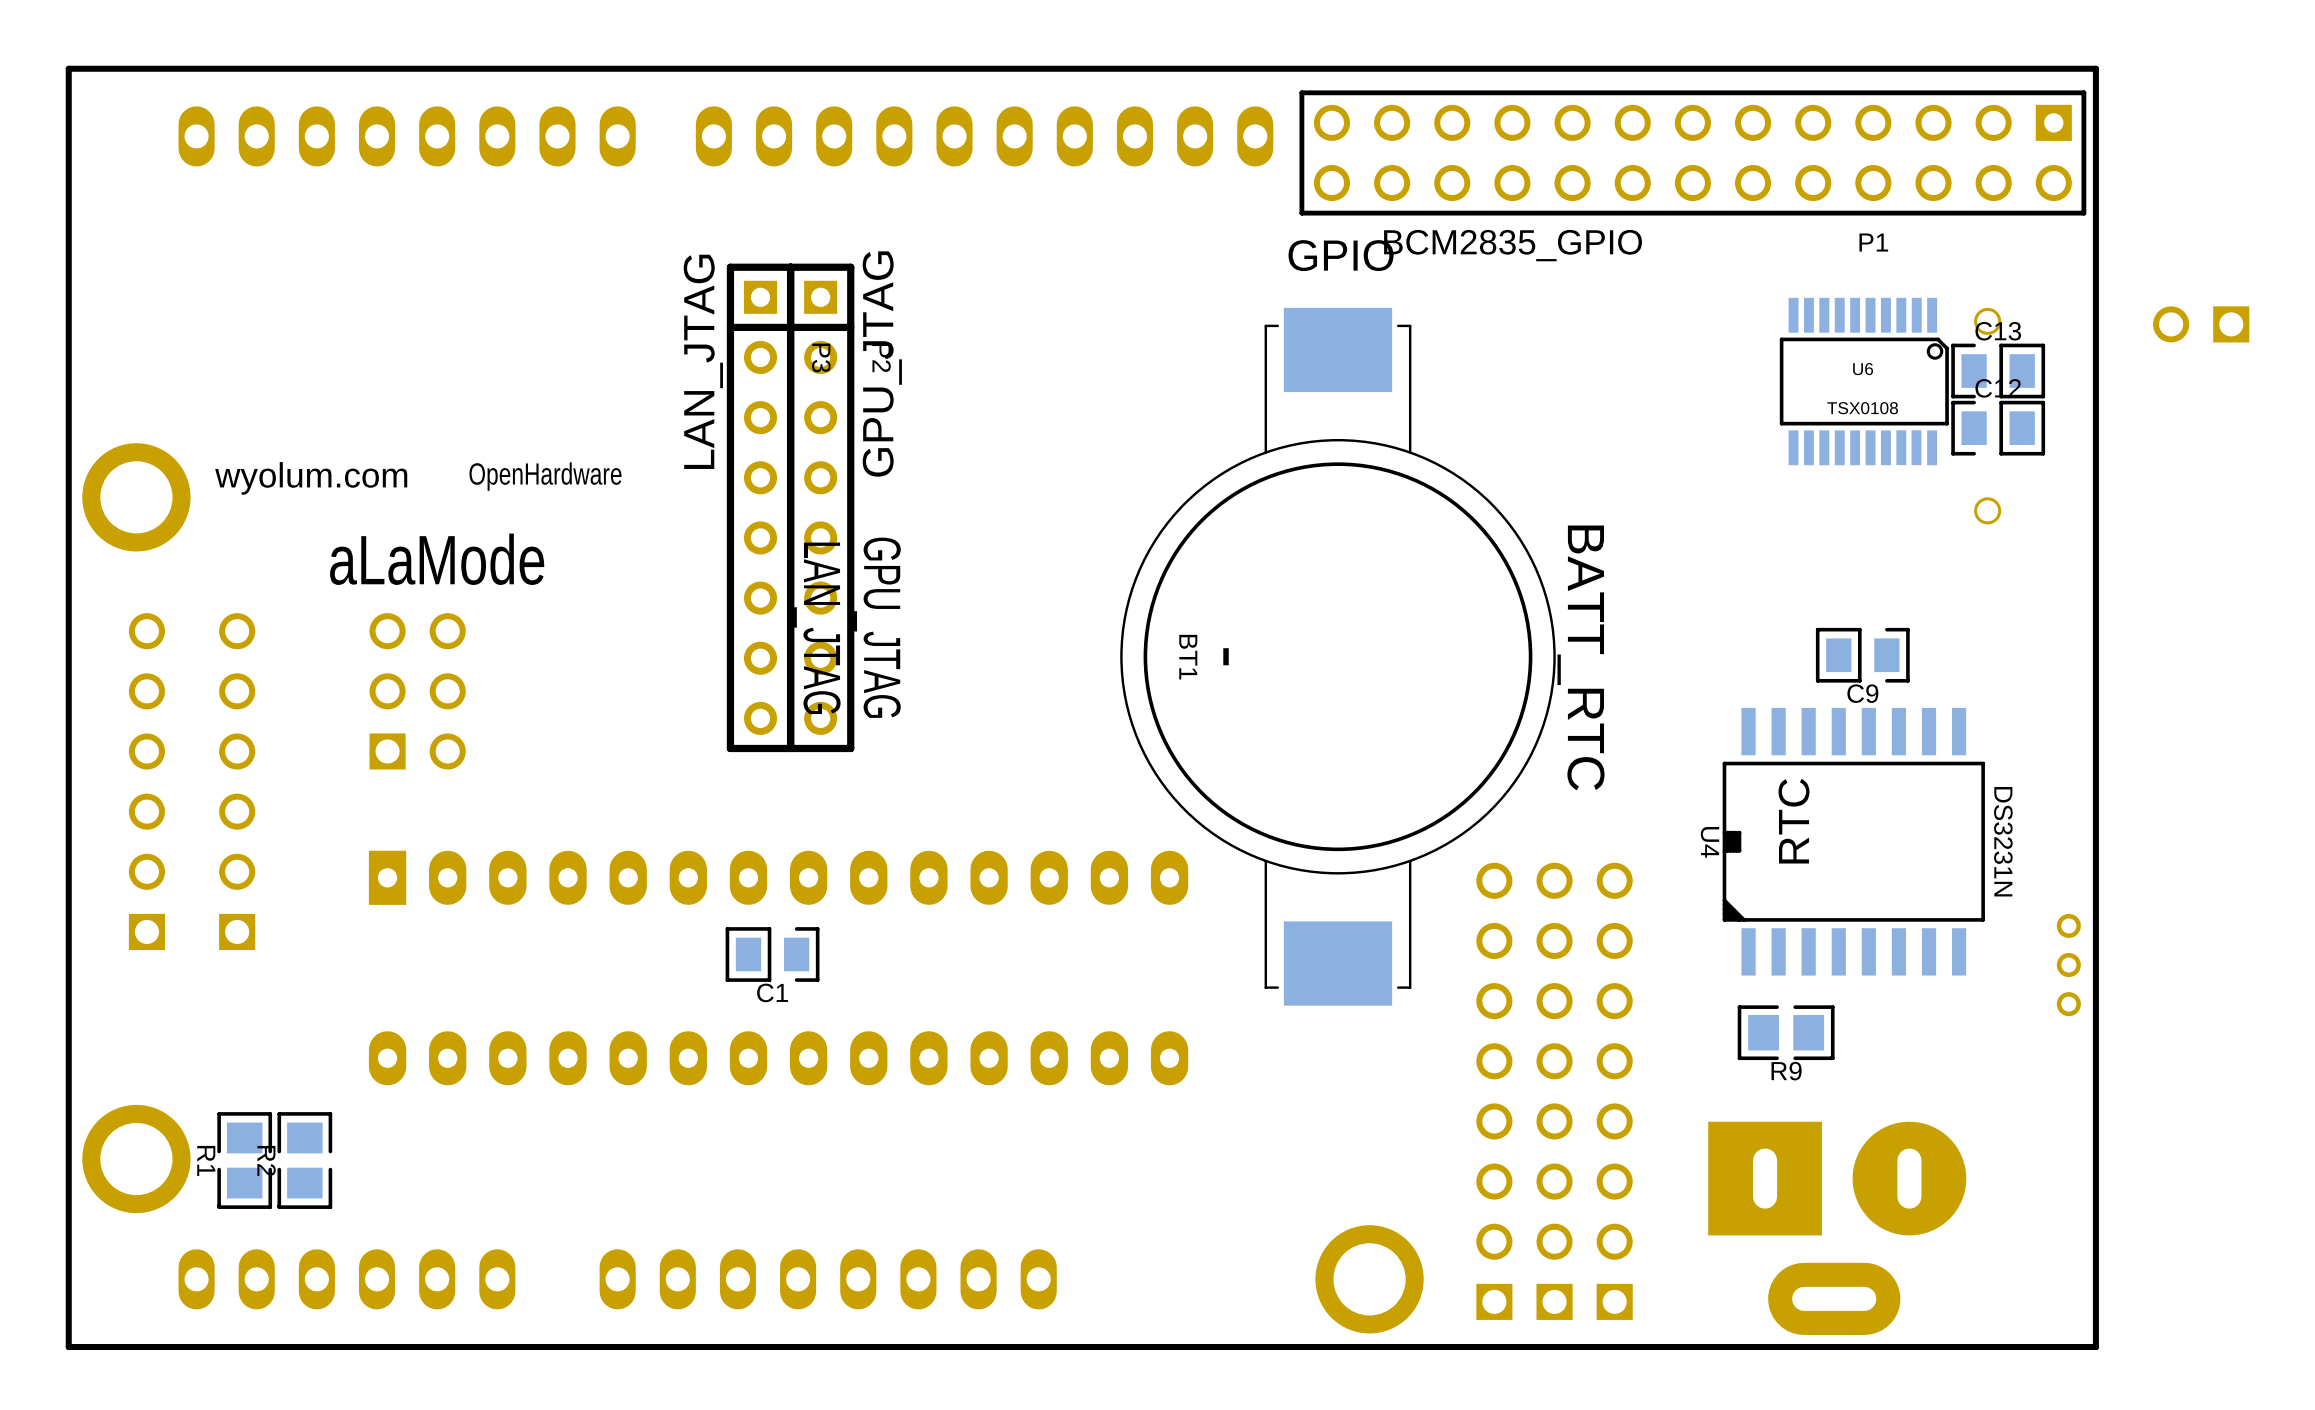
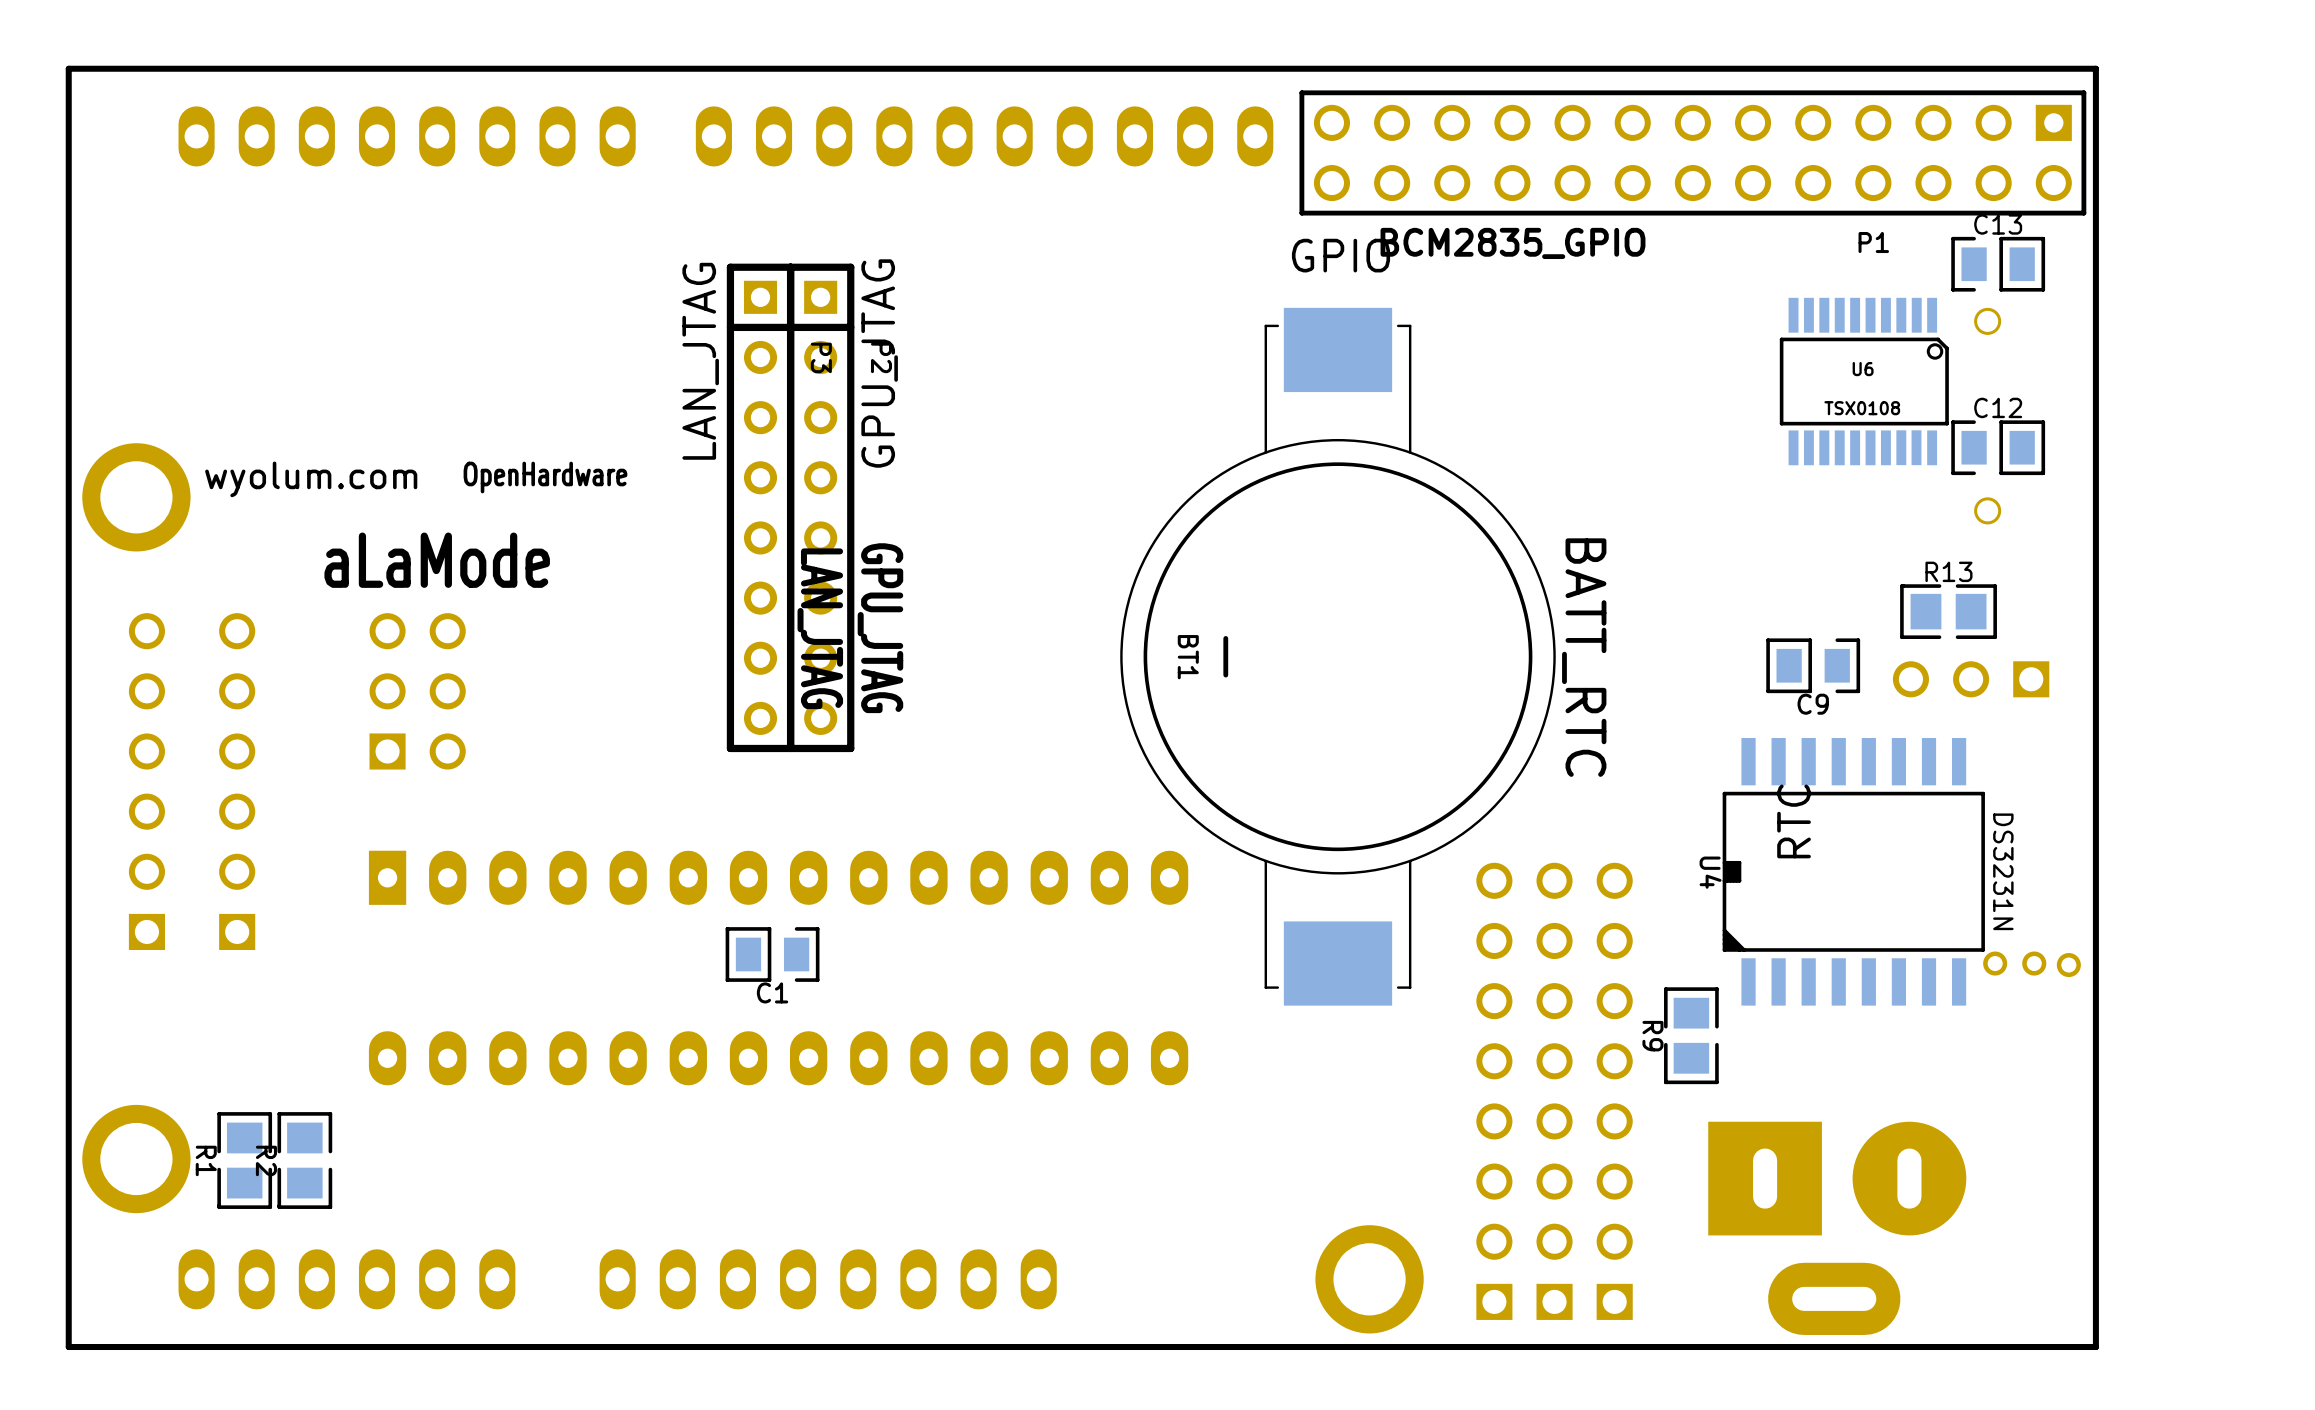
part: (2201, 324) -> none
C13 position: (1998, 371) -> (1998, 264)
C12 position: (1998, 428) -> (1998, 447)
R13: none -> (1948, 611)
C9 position: (1862, 655) -> (1813, 665)
part: none -> (1971, 679)
U4 position: (1853, 841) -> (1853, 871)
part: (2068, 925) -> none
part: none -> (1995, 963)
part: none -> (2034, 963)
part: (2068, 1004) -> none
R9 rotation: 0° (1786, 1032) -> 90° clockwise (1691, 1035)
R9 position: (1786, 1032) -> (1691, 1035)

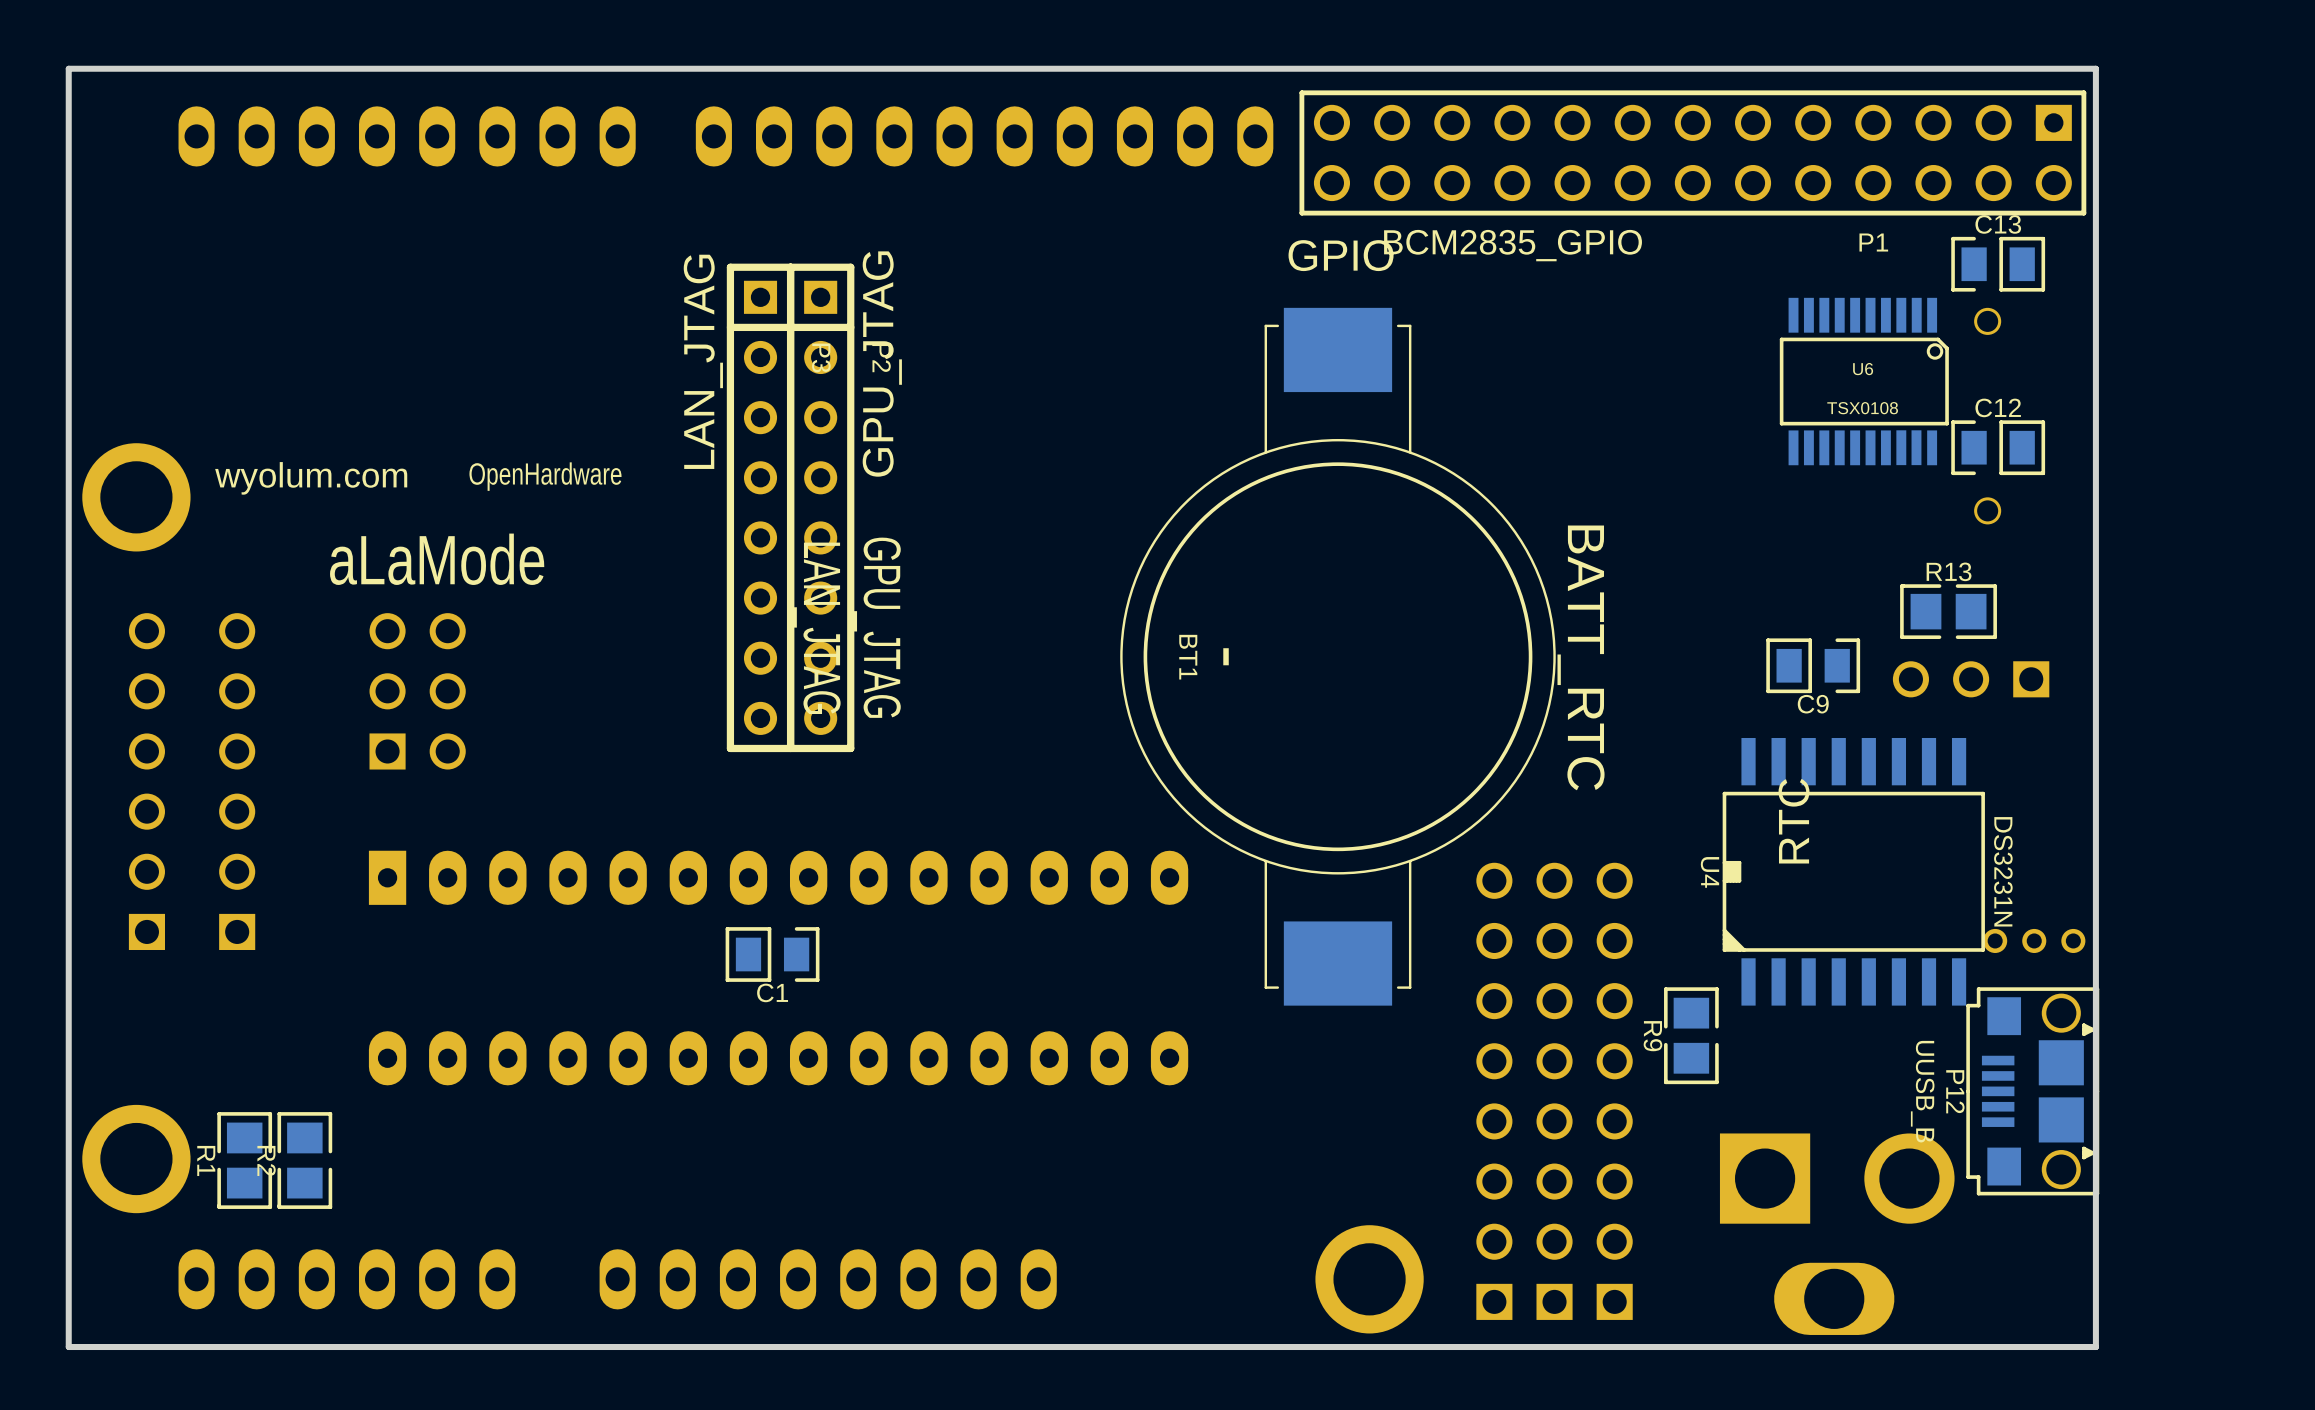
part: none -> (1995, 940)
part: none -> (2034, 940)
part: none -> (2073, 940)
part: (1995, 963) -> none
part: (2034, 963) -> none
part: (2068, 965) -> none
P12: none -> UUSB_B (2032, 1091)
part footprint: [1708, 1121, 1967, 1335] -> [1719, 1133, 1955, 1335]

